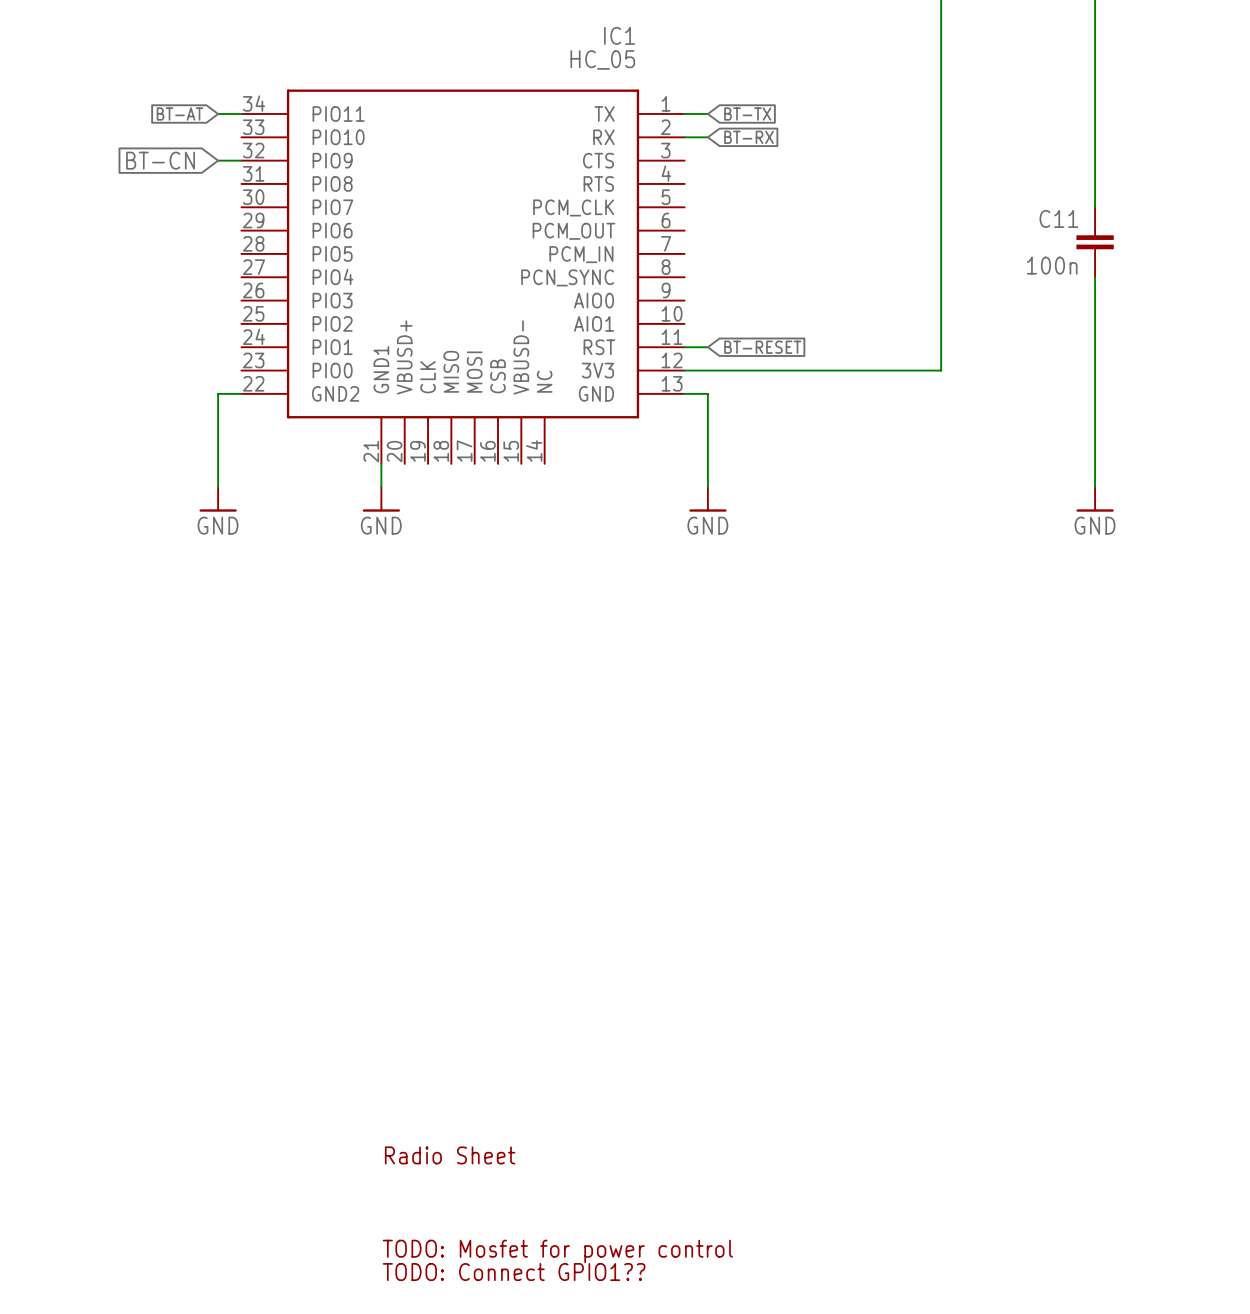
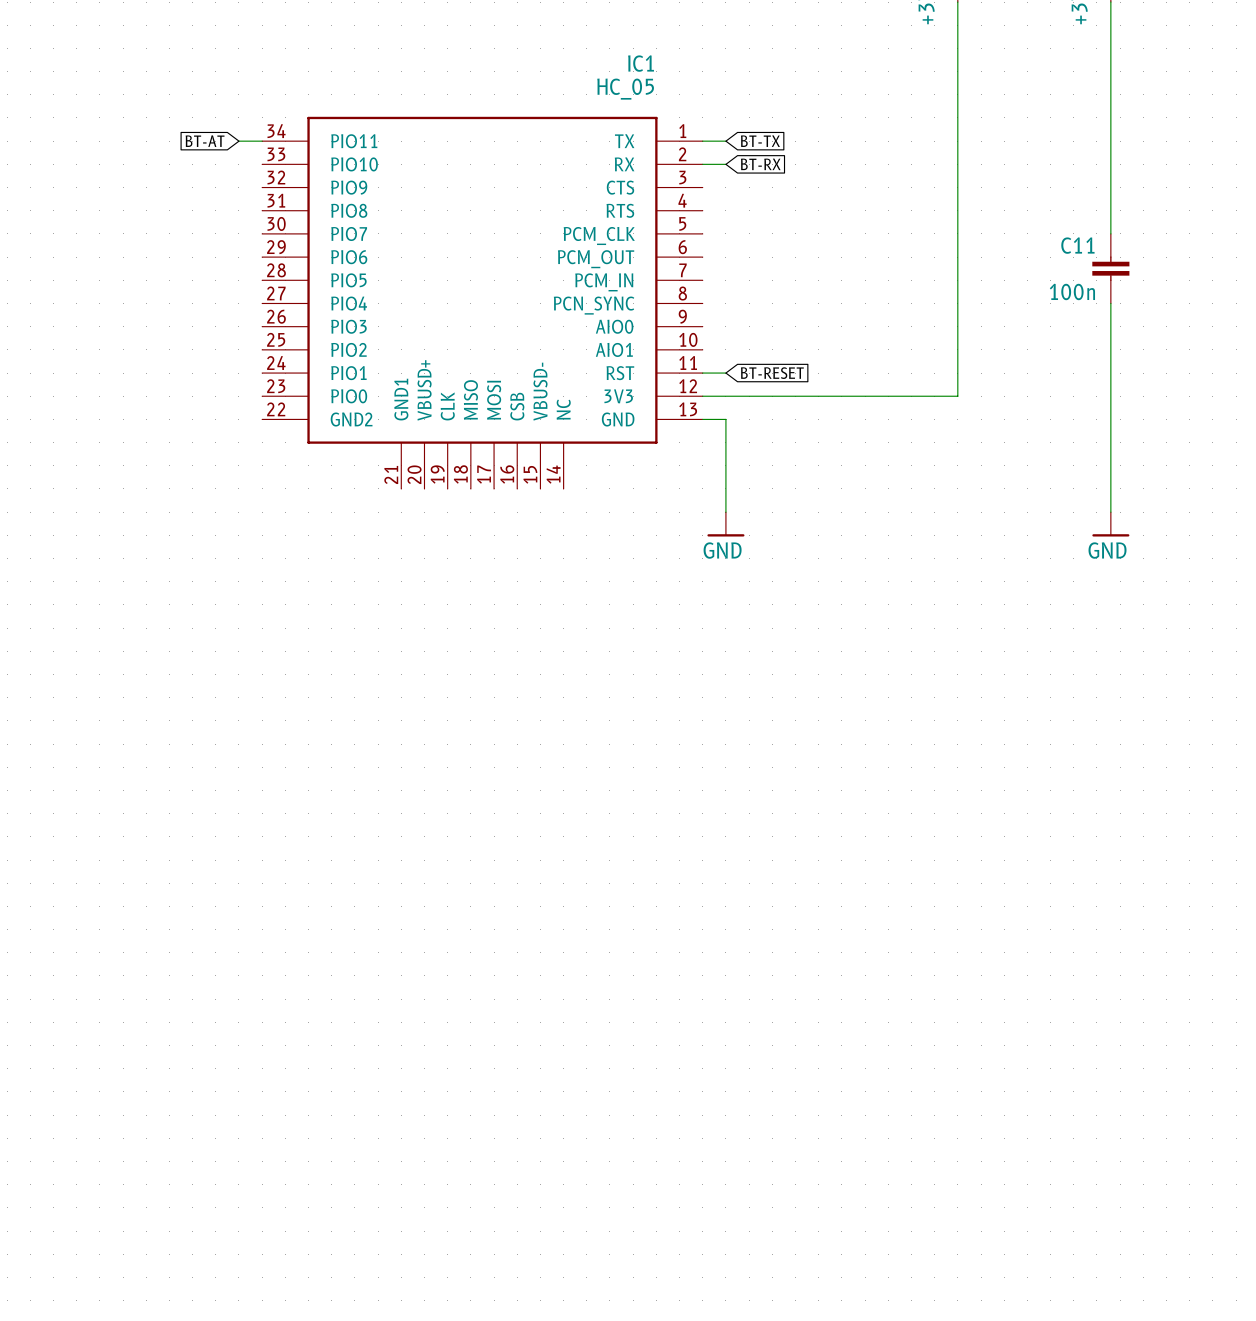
global label: BT-CN (160, 160) -> none
wire: (218, 160) (241, 160) -> none
wire: (241, 393) (218, 393) (218, 487) -> none
wire: (381, 463) (381, 487) -> none
power symbol: GND (218, 499) -> none
power symbol: GND (381, 499) -> none
text: Radio Sheet (450, 1155) -> none
text: TODO: Mosfet for power control (557, 1251) -> none
text: TODO: Connect GPIO1?? (514, 1272) -> none

